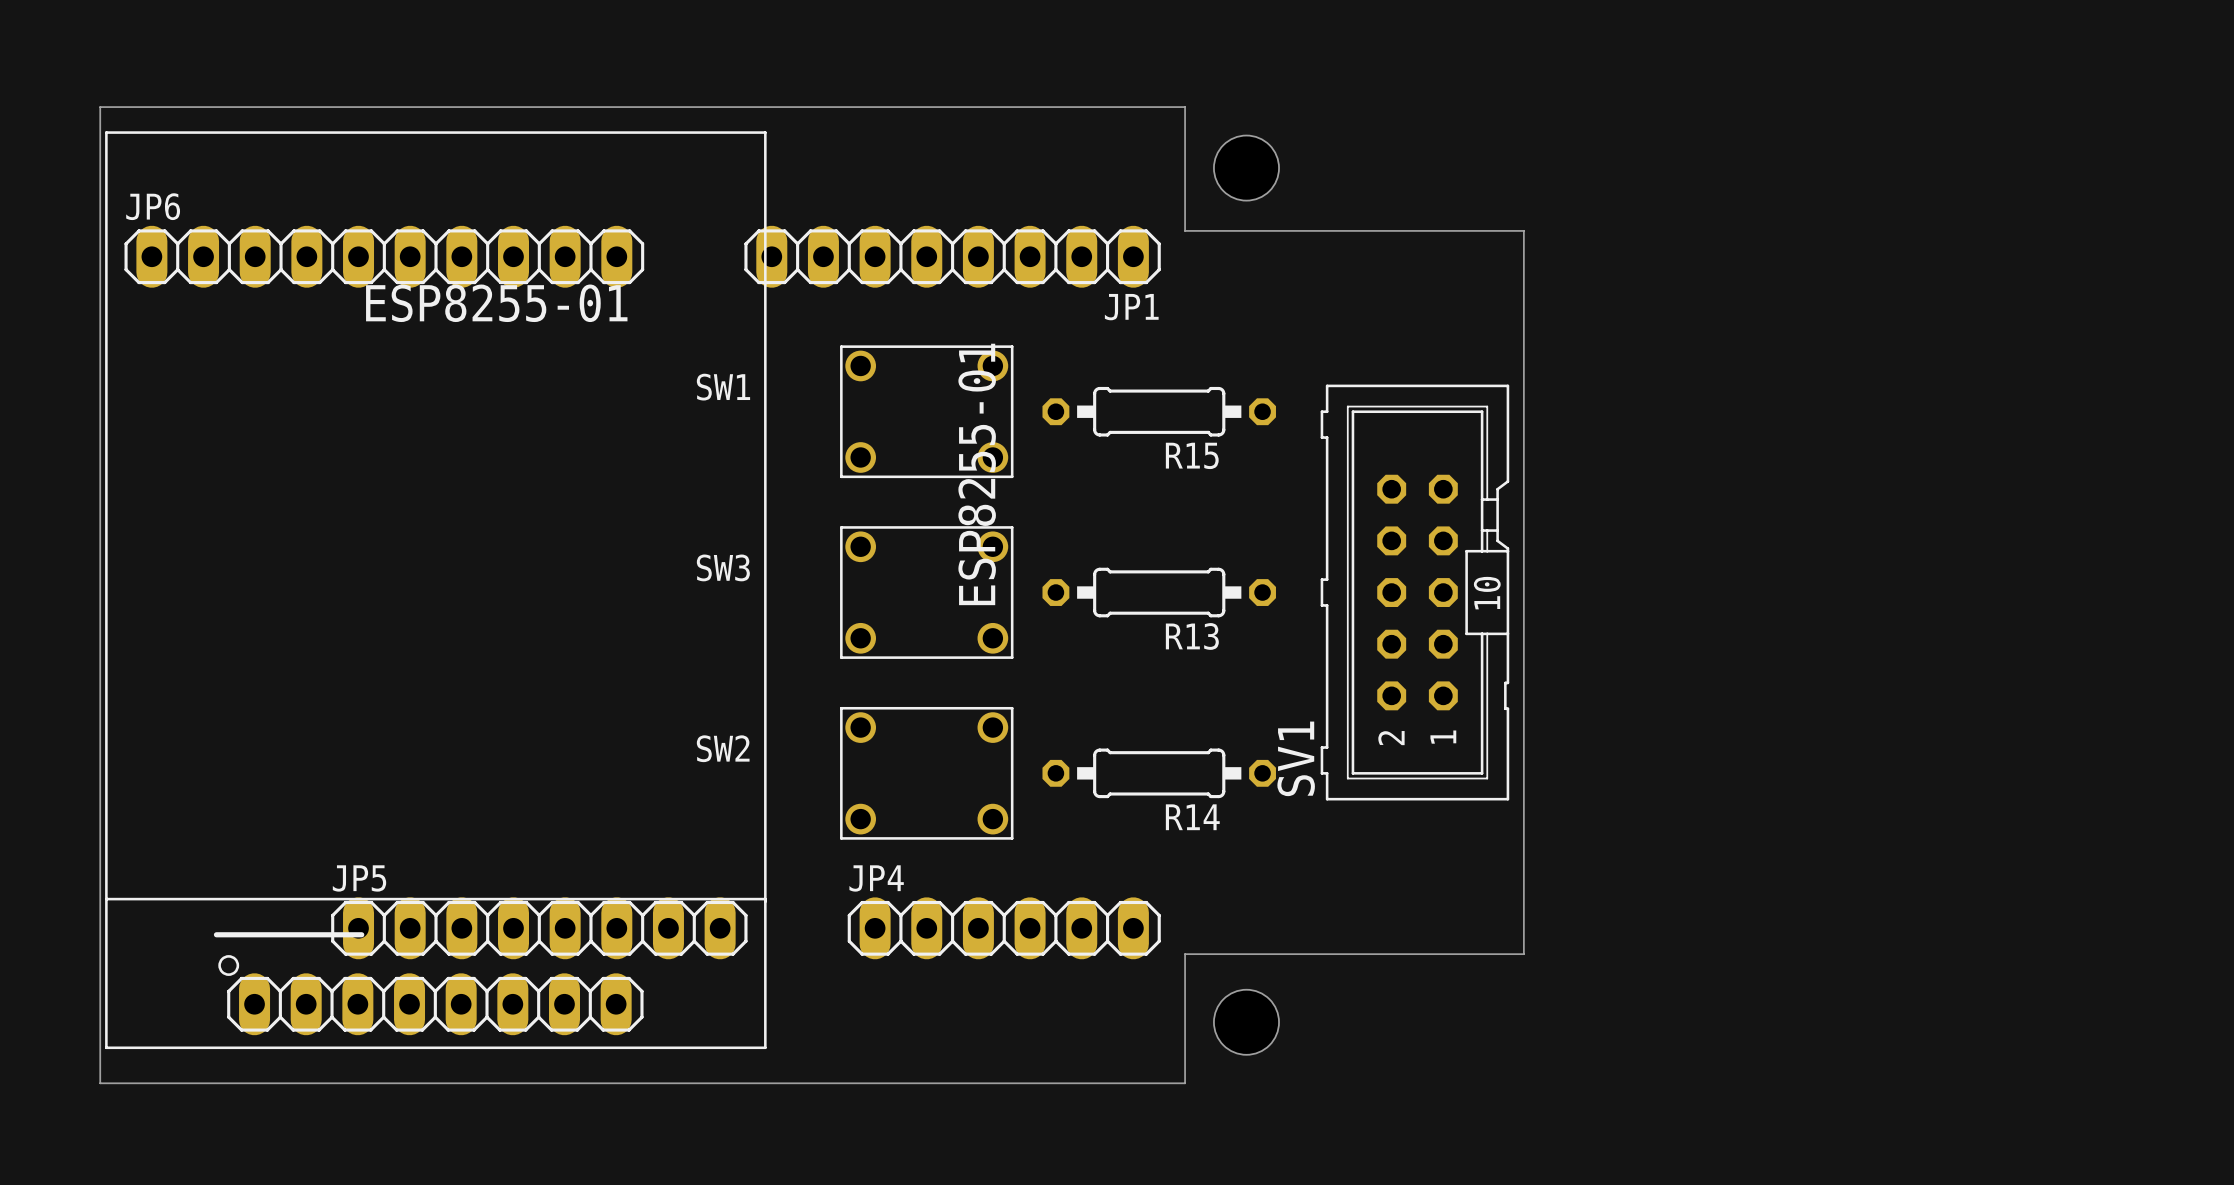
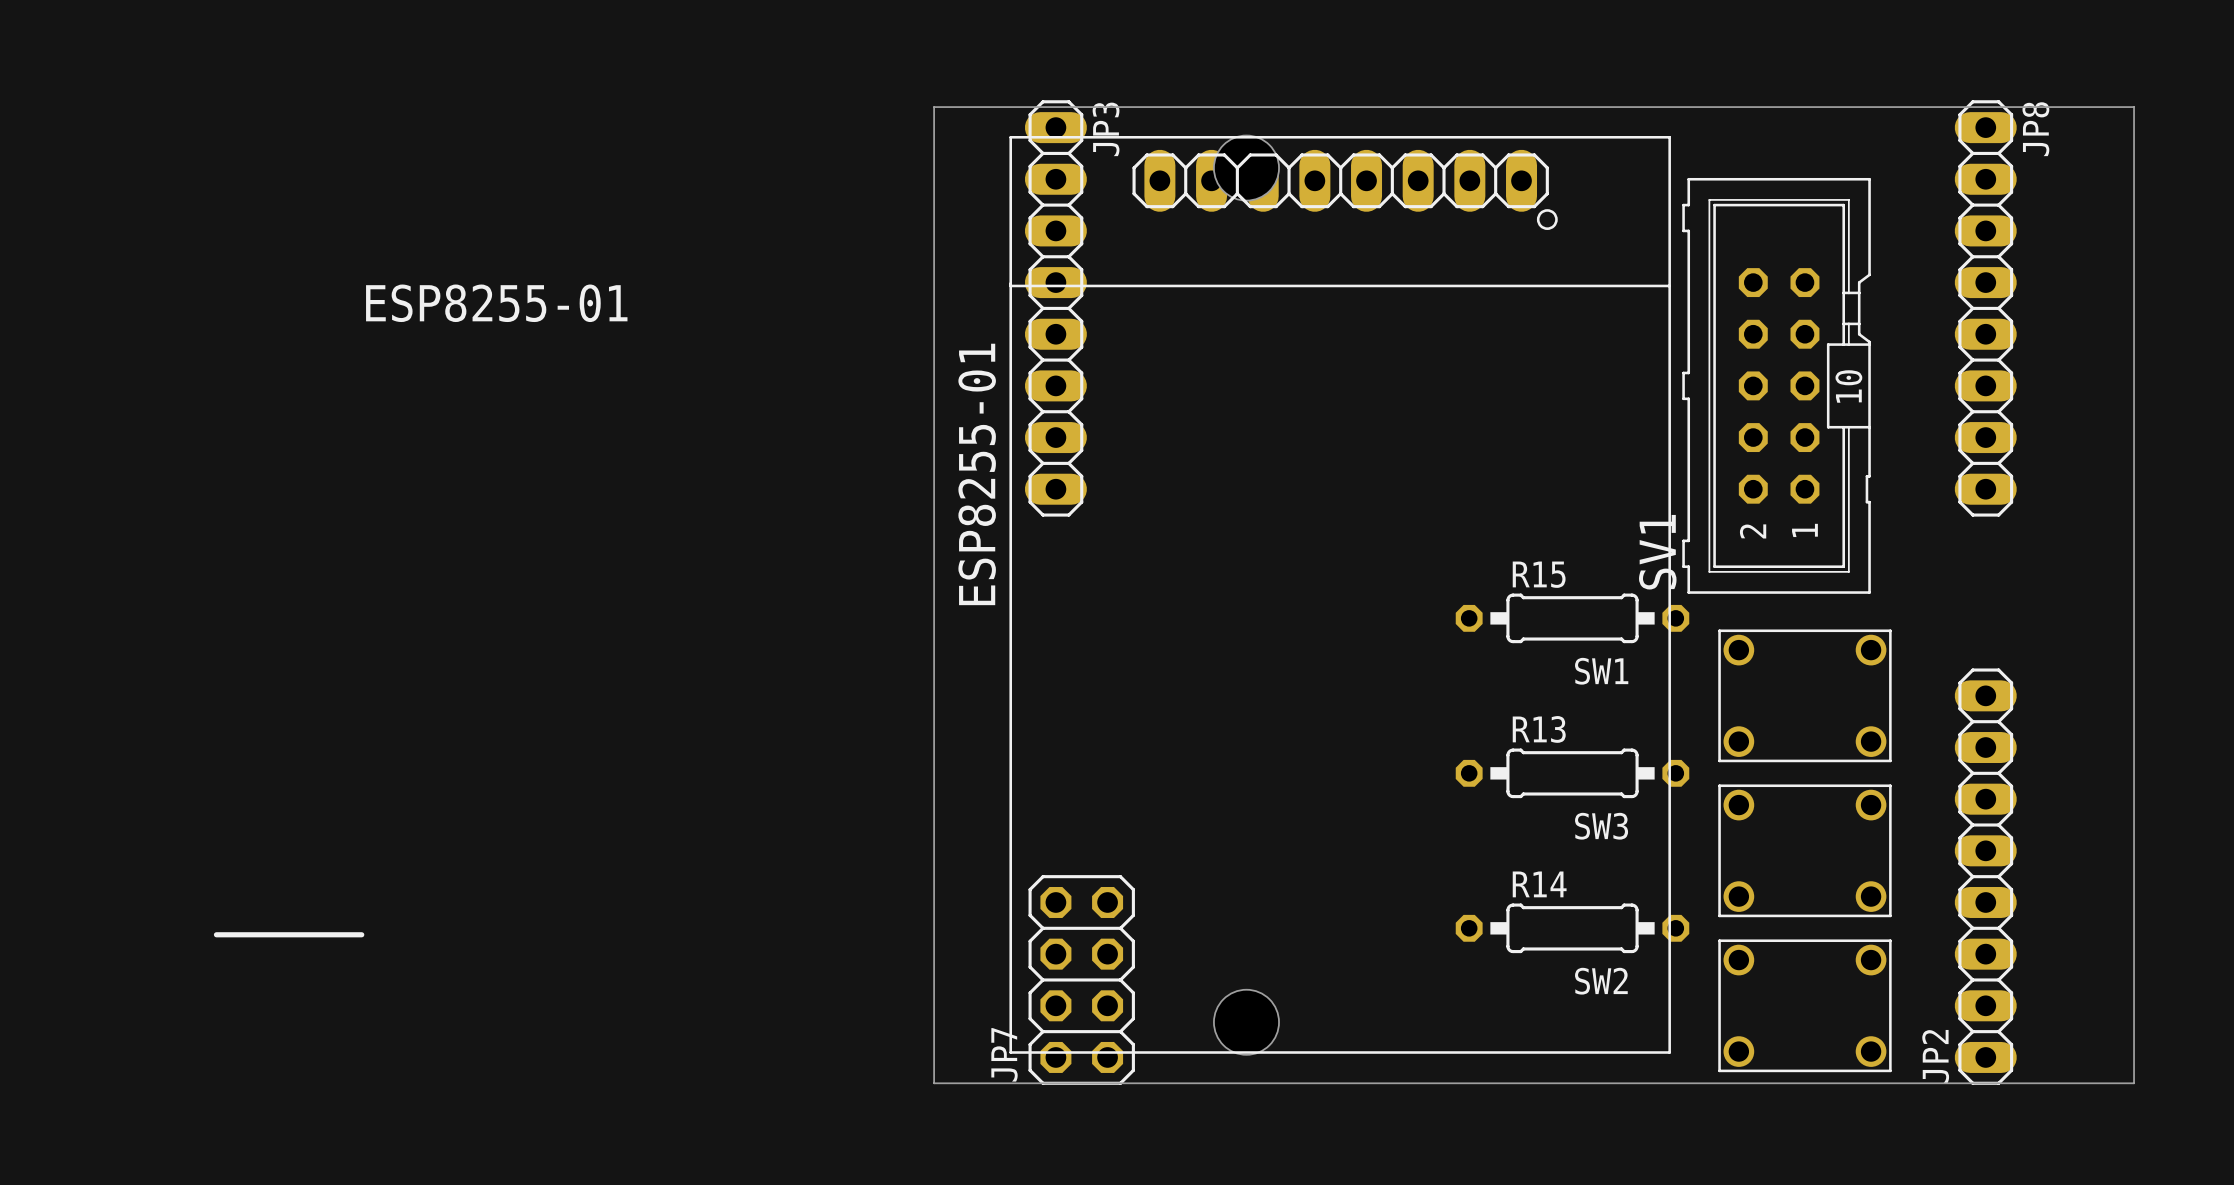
board edge: (934, 107) (100, 107) (100, 1083) (934, 1083) -> (934, 107) (934, 1083)
board edge: (1185, 107) (1185, 230) (1523, 230) (1523, 954) (1185, 954) (1185, 1083) -> (1185, 107) (2134, 107) (2134, 1083) (1185, 1083)
JP6: (384, 256) -> none
JP1: (952, 256) -> none
JP3: none -> (1055, 308)
JP8: none -> (1985, 308)
SW1 position: (926, 411) -> (1804, 695)
R15 position: (1159, 411) -> (1572, 618)
R15 name position: R15 (1192, 455) -> R15 (1539, 574)
part: (436, 590) -> none
SW3 position: (926, 592) -> (1804, 850)
R13 position: (1159, 592) -> (1572, 773)
SV1 position: (1414, 592) -> (1776, 385)
part: none -> (1340, 594)
R13 name position: R13 (1192, 636) -> R13 (1539, 729)
SW2 position: (926, 773) -> (1804, 1005)
R14 position: (1159, 773) -> (1572, 928)
R14 name position: R14 (1192, 817) -> R14 (1539, 884)
JP2: none -> (1985, 876)
JP5: (539, 928) -> none
JP4: (1004, 928) -> none
JP7: none -> (1081, 979)

